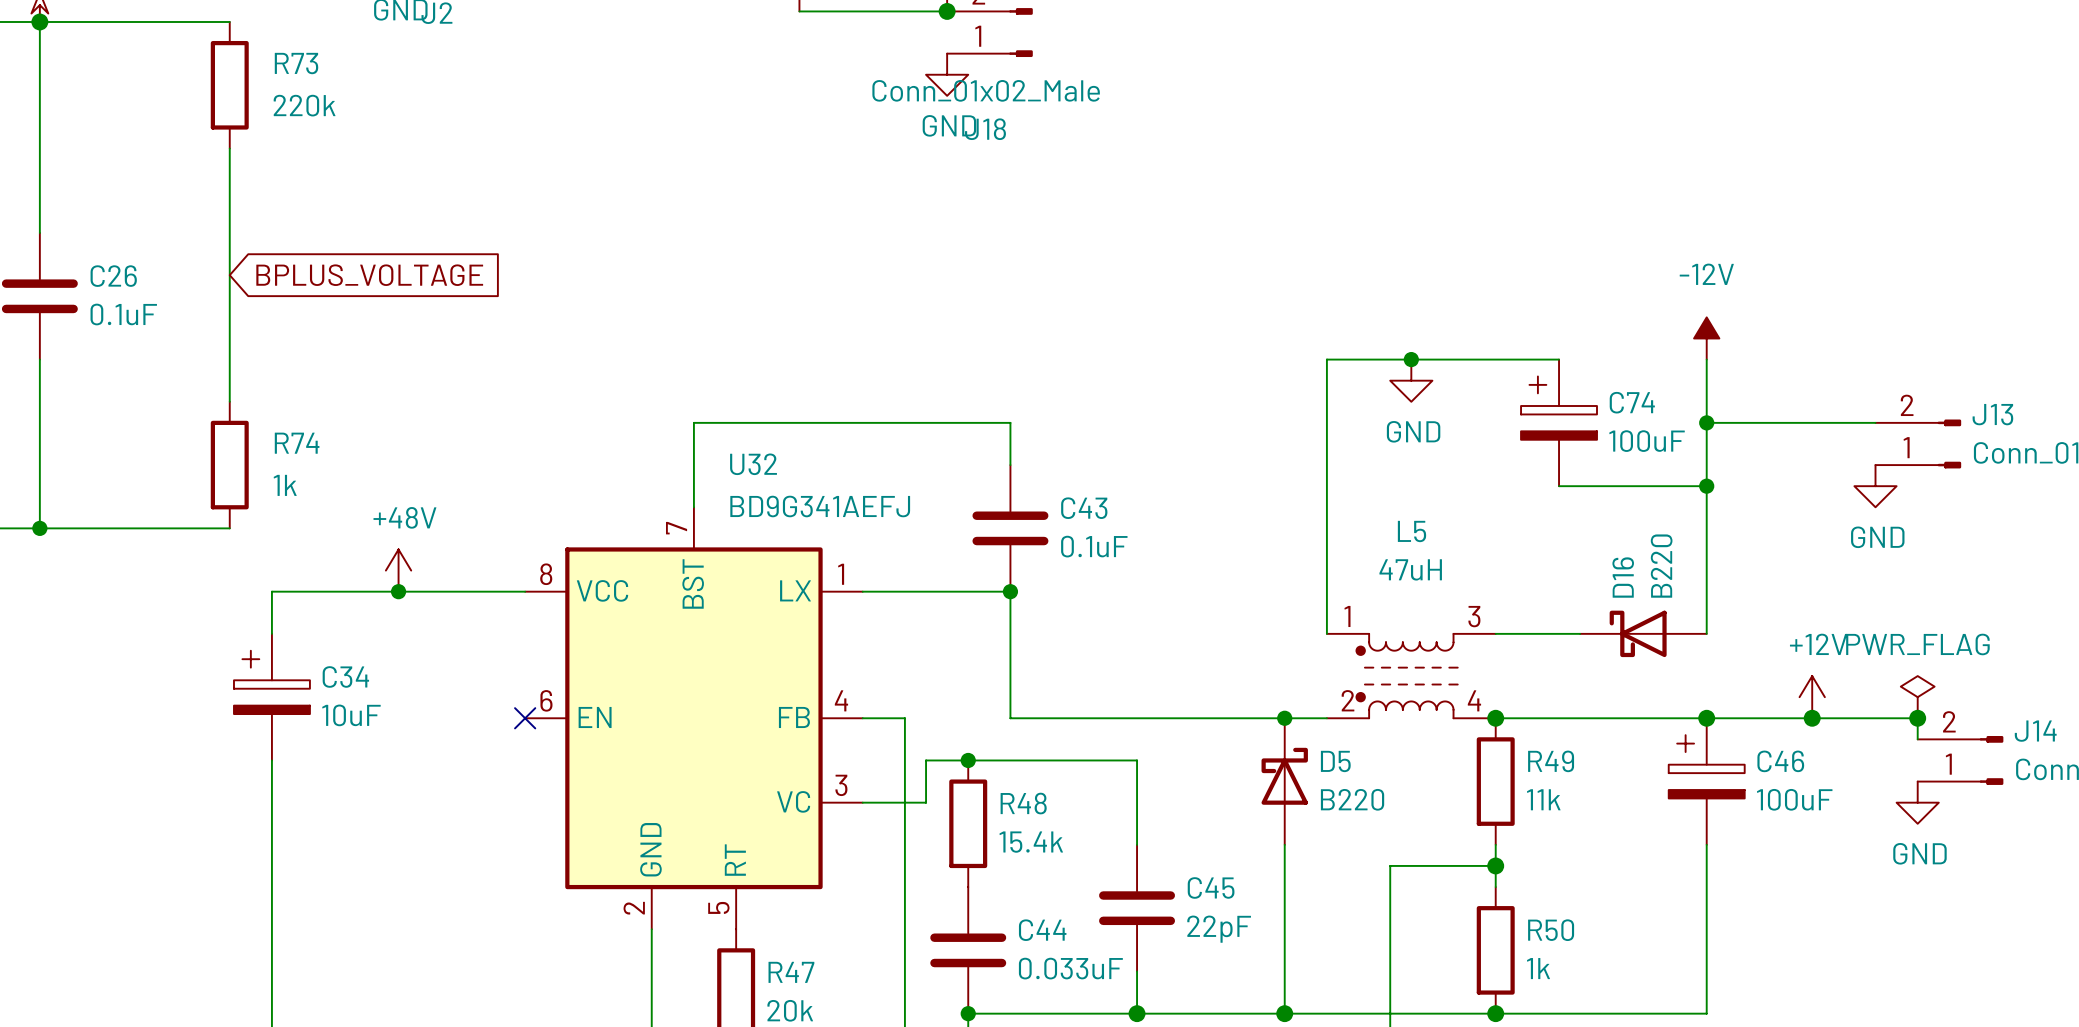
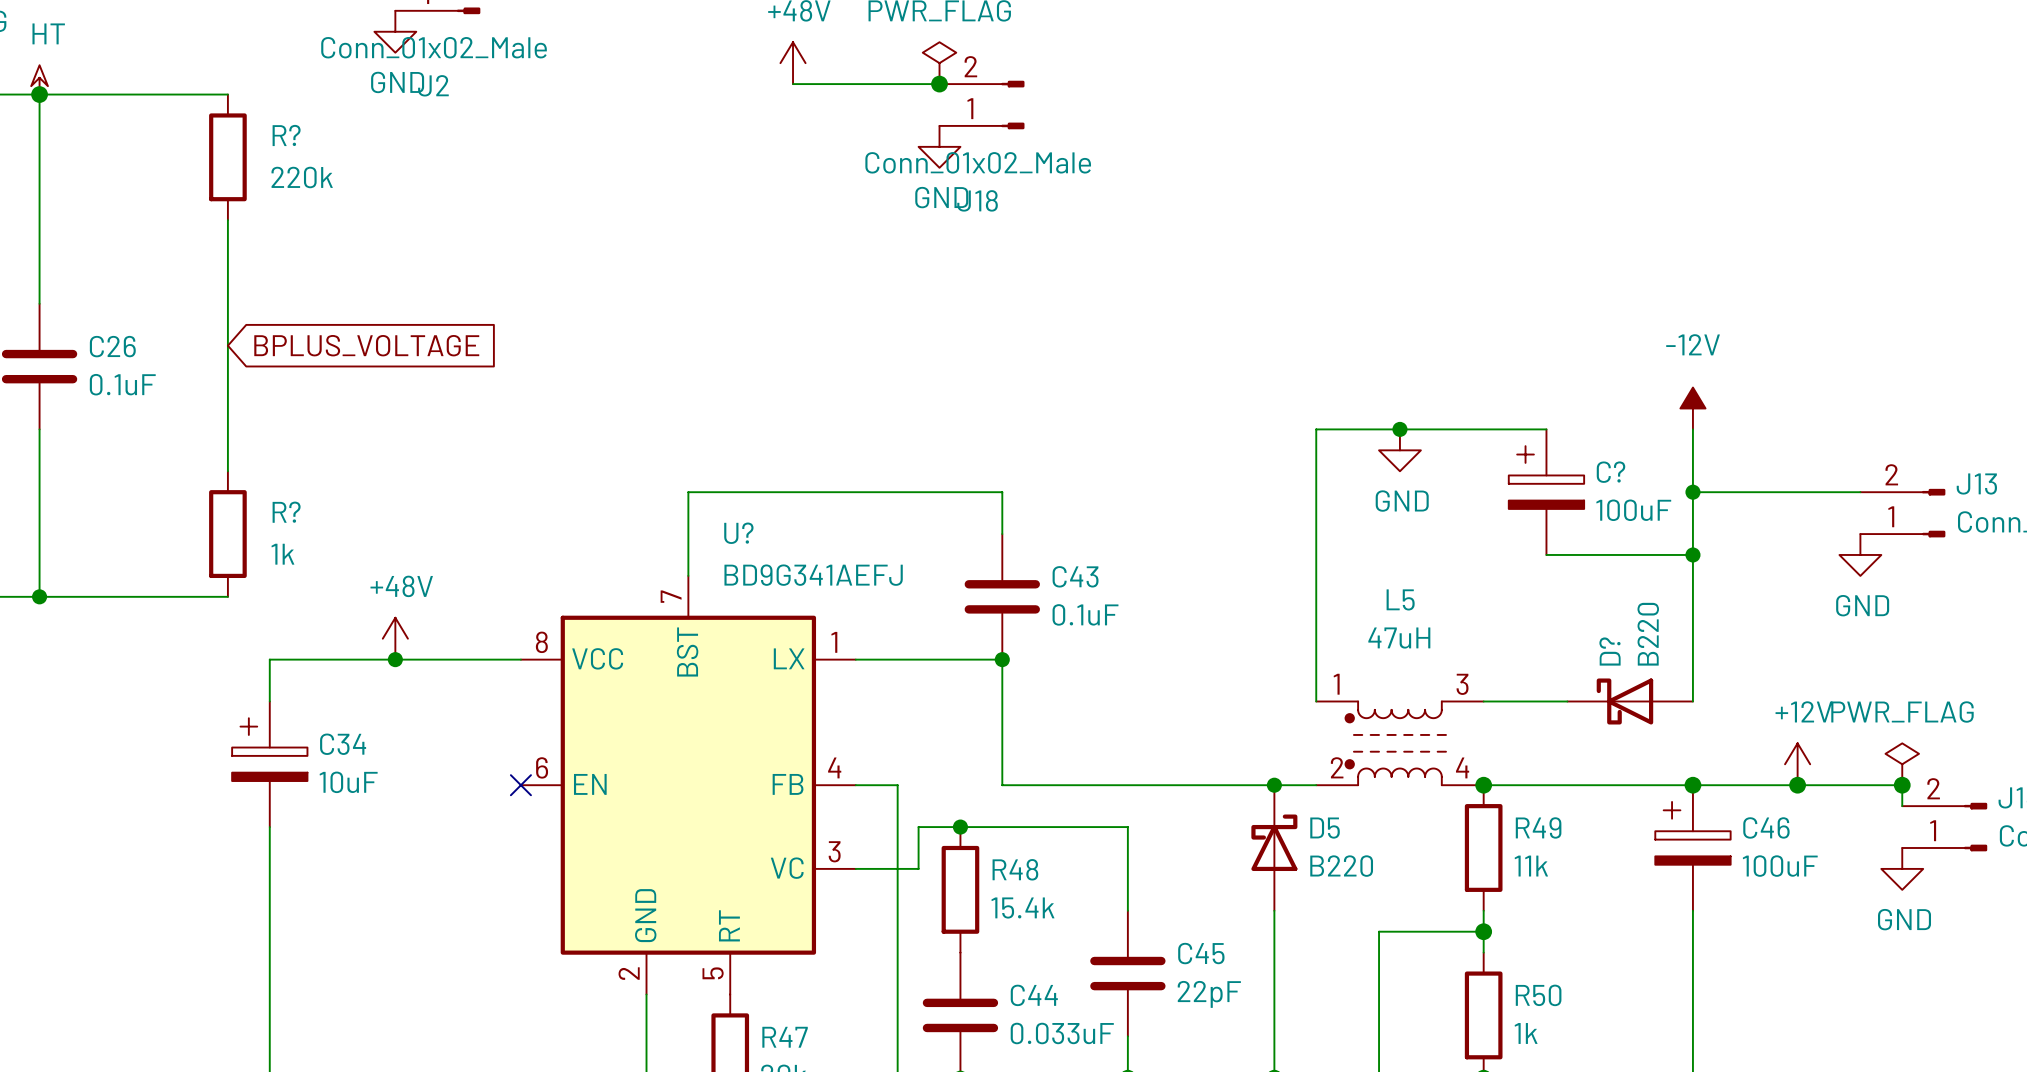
R73 name: R73 (296, 63) -> R? (286, 135)
C74 name: C74 (1632, 402) -> C? (1611, 472)
R74 name: R74 (297, 443) -> R? (286, 512)
U32 name: U32 (753, 464) -> U? (738, 533)
D16 name: D16 (1623, 577) -> D? (1610, 651)

